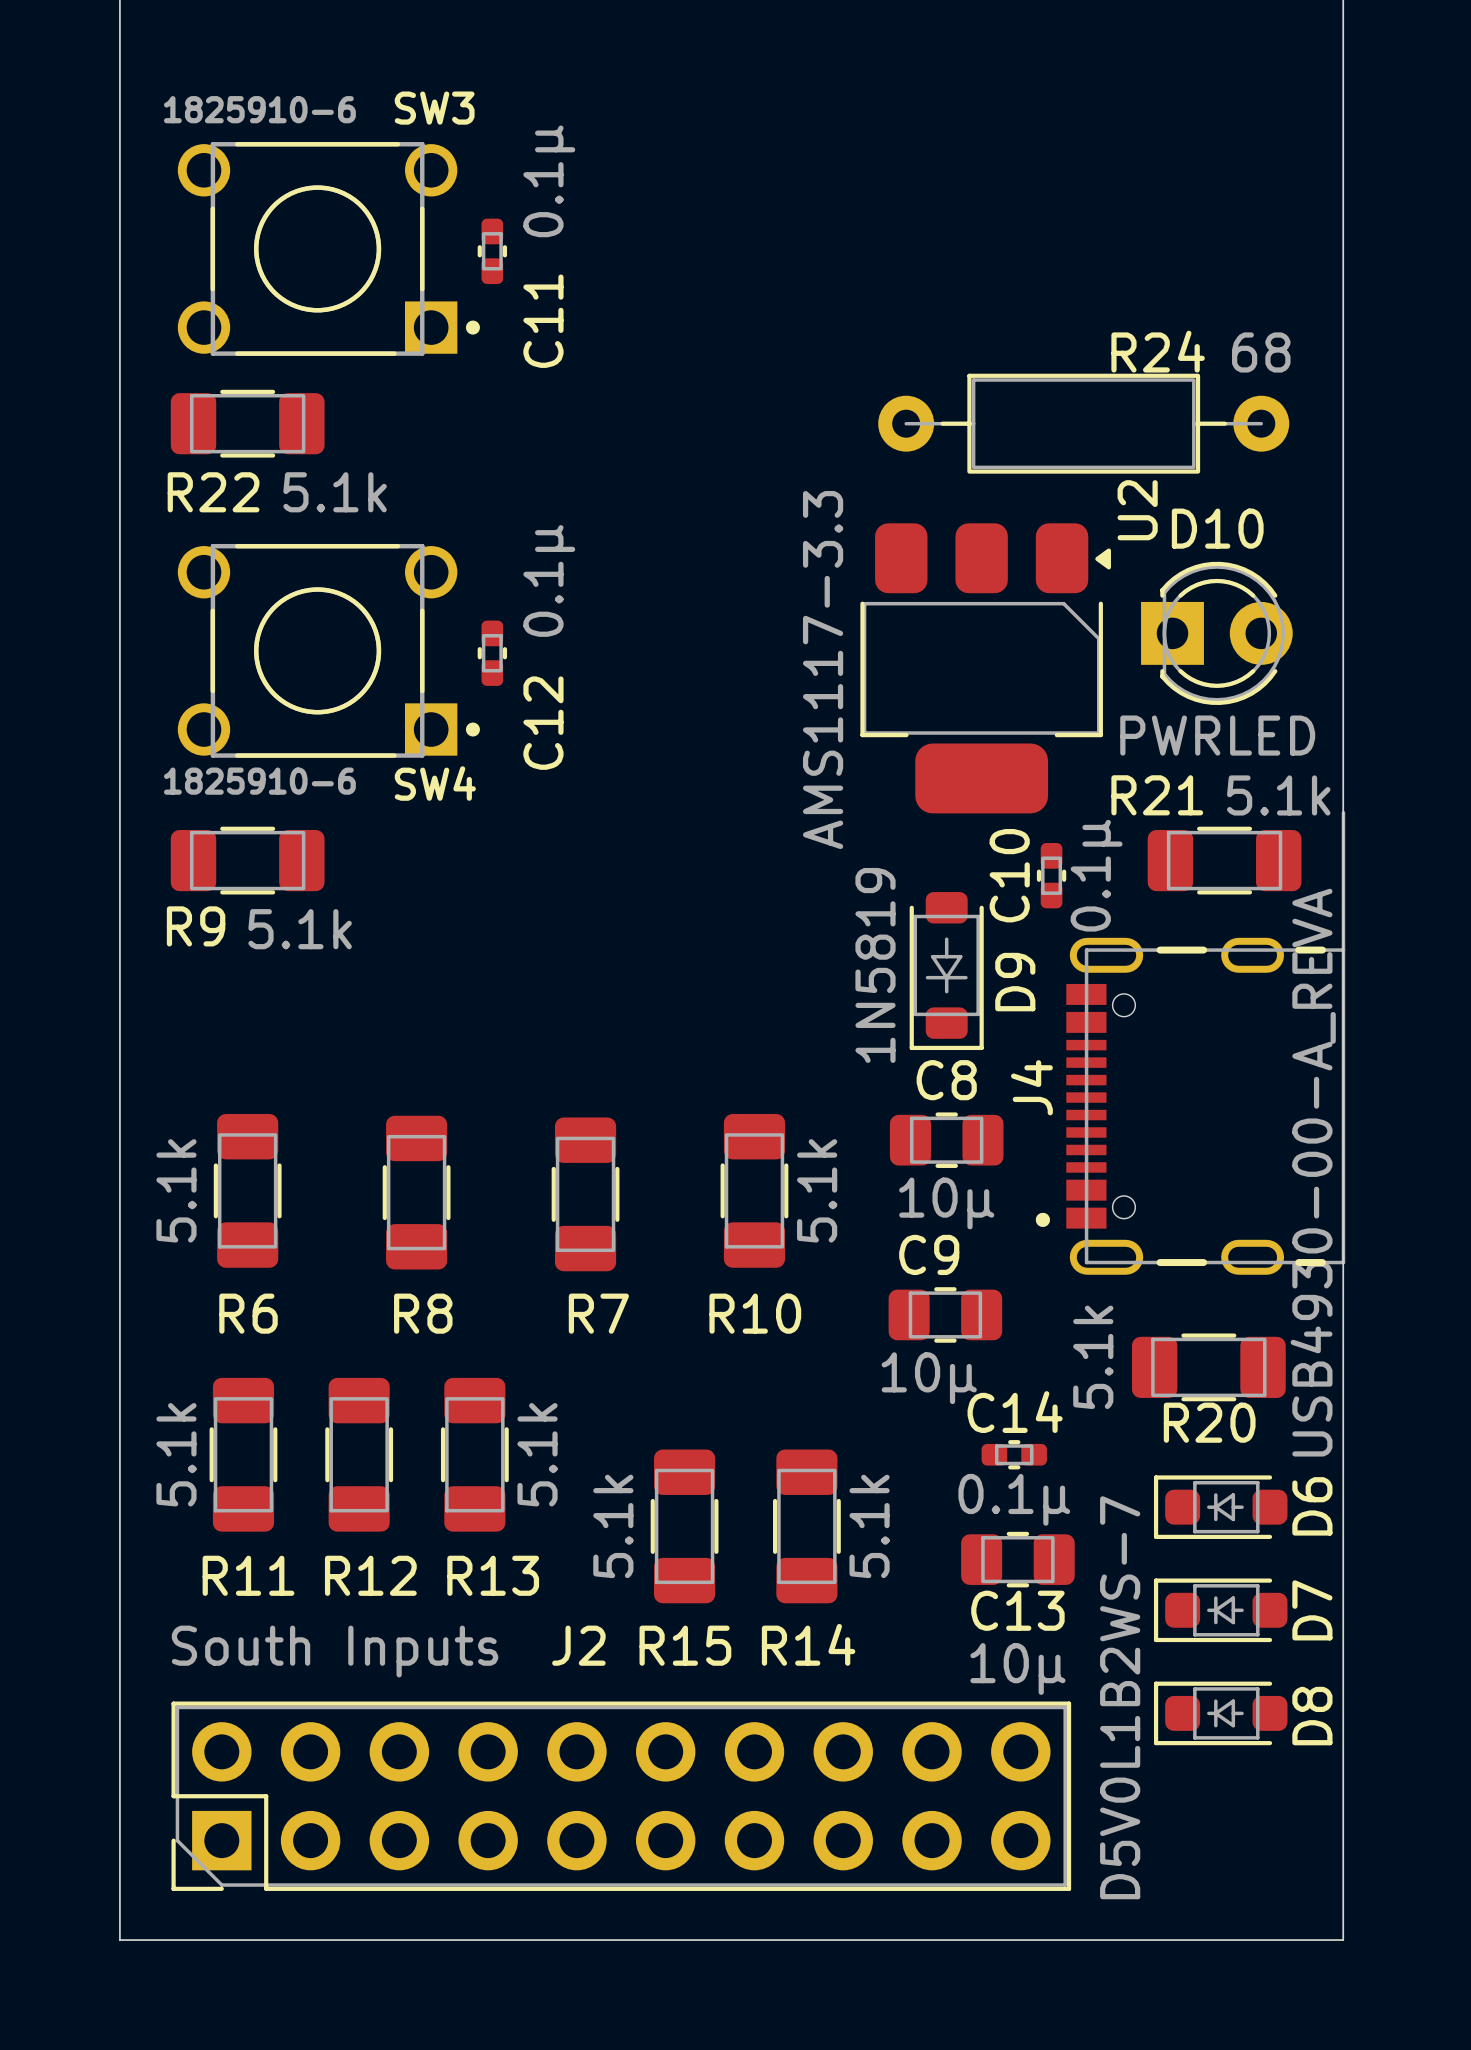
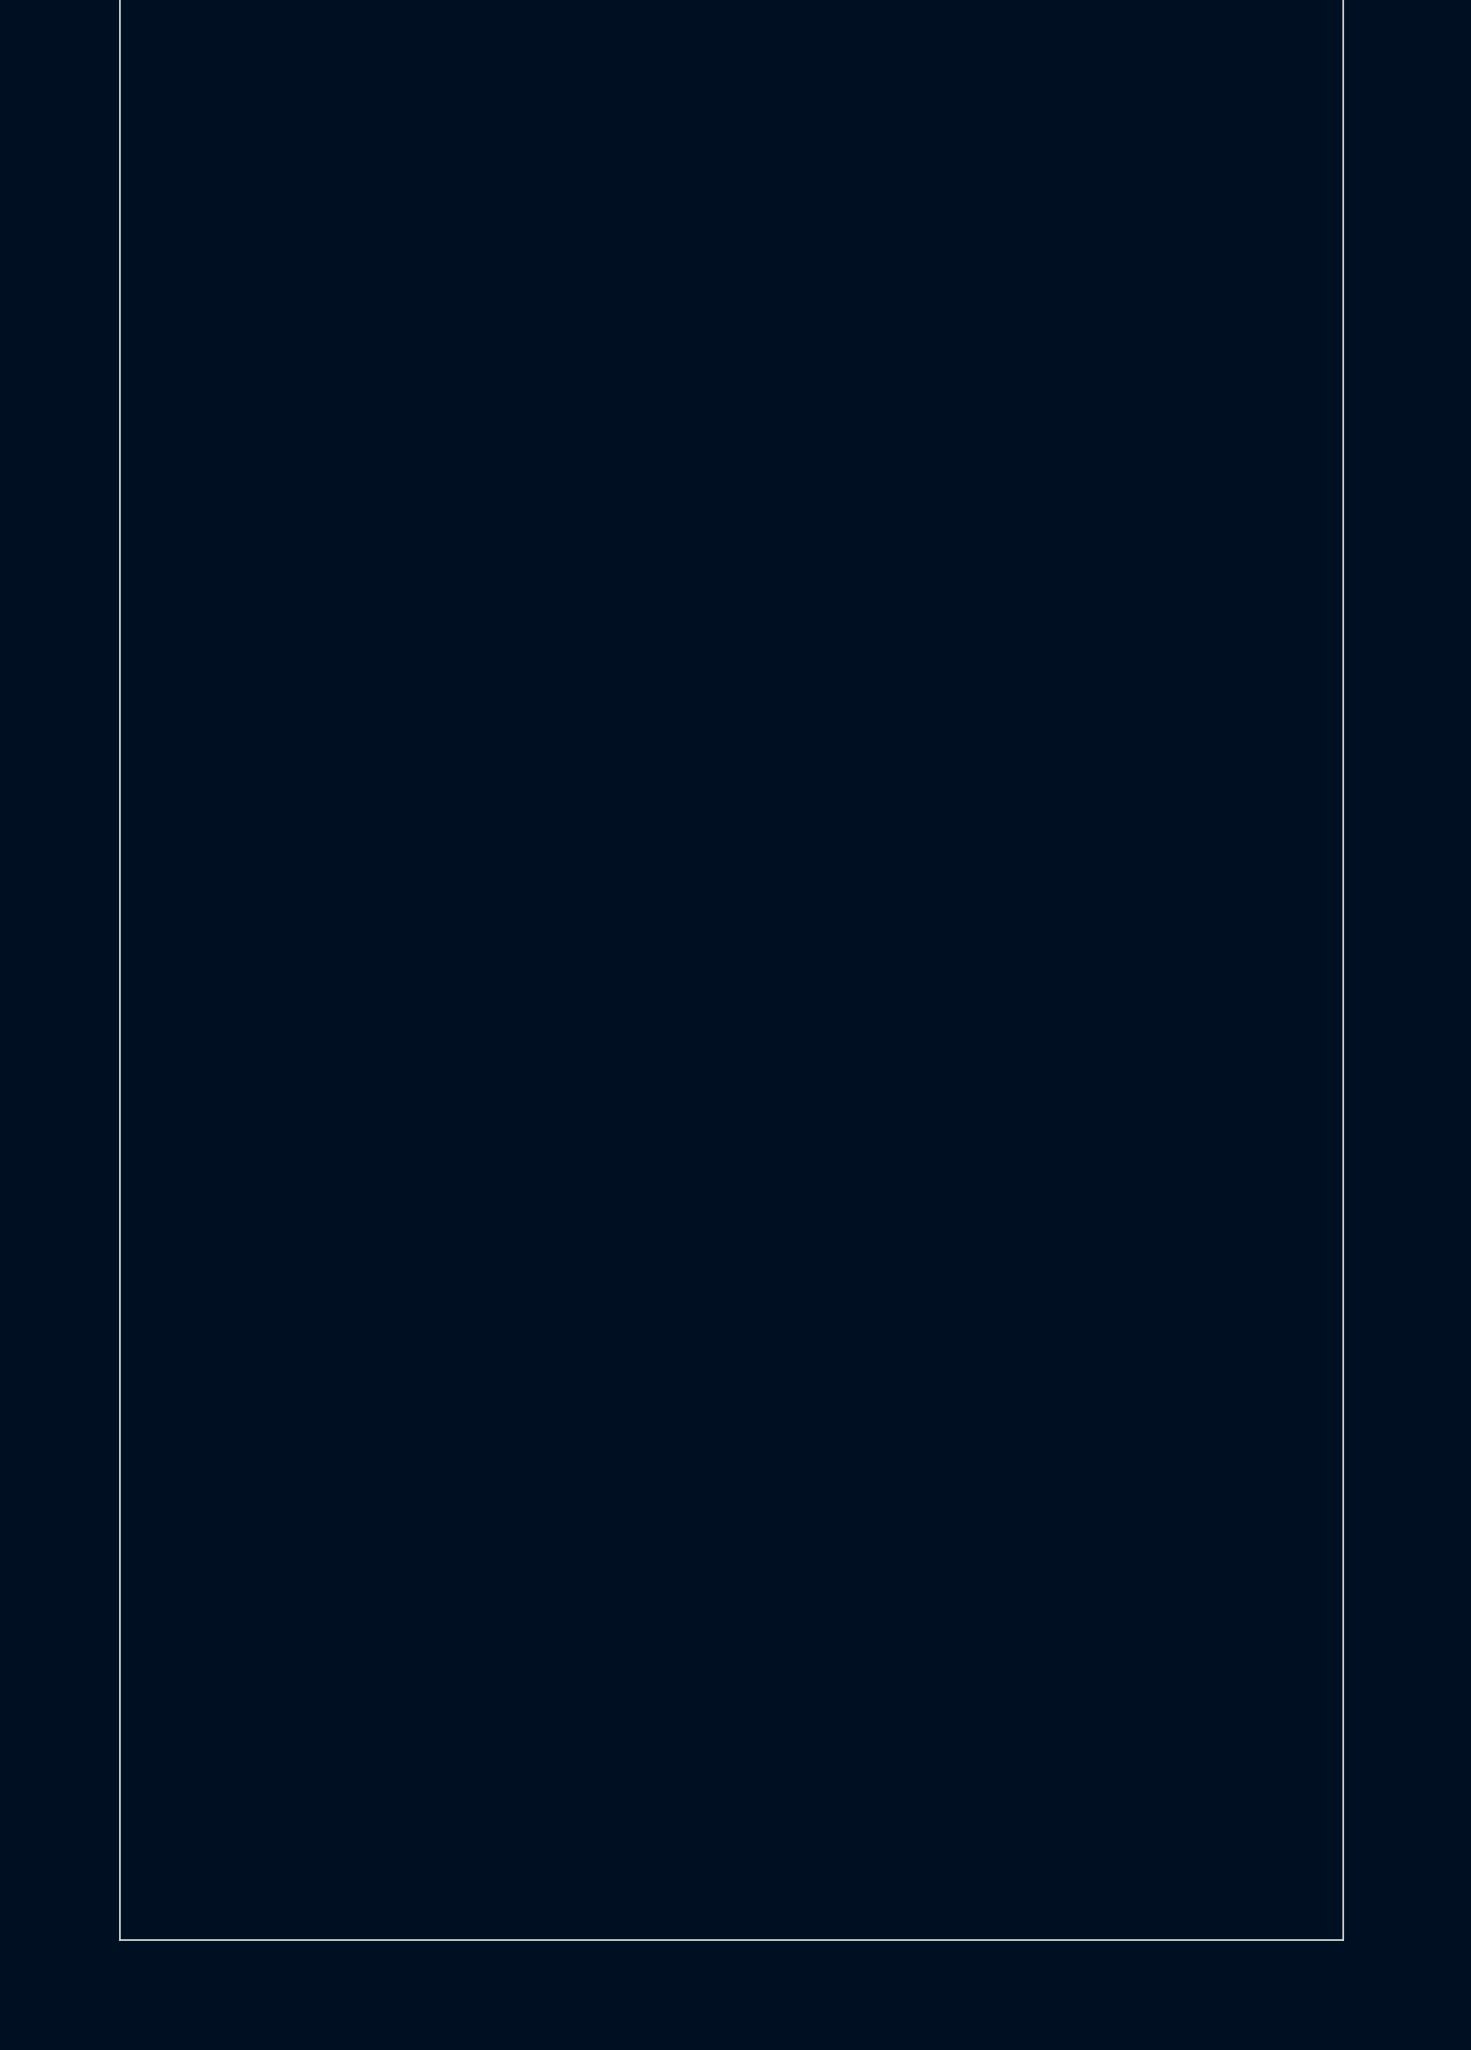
SW3: 1825910-6 (328, 248) -> none
C11: 0.1μ (492, 251) -> none
R22: 5.1k (247, 423) -> none
R24: 68 (1083, 423) -> none
D10: PWRLED (1216, 633) -> none
SW4: 1825910-6 (328, 650) -> none
C12: 0.1μ (492, 653) -> none
U2: AMS1117-3.3 (985, 668) -> none
R9: 5.1k (247, 860) -> none
R21: 5.1k (1224, 860) -> none
C10: 0.1μ (1051, 875) -> none
D9: 1N5819 (946, 971) -> none
J4: USB4930-00-A_REVA (1190, 1042) -> none
C8: 10μ (946, 1140) -> none
R6: 5.1k (247, 1190) -> none
R10: 5.1k (754, 1190) -> none
R8: (416, 1192) -> none
R7: (585, 1194) -> none
C9: 10μ (945, 1314) -> none
R20: 5.1k (1208, 1367) -> none
R11: 5.1k (243, 1454) -> none
R12: (359, 1454) -> none
R13: 5.1k (474, 1454) -> none
C14: 0.1μ (1014, 1454) -> none
D6: (1220, 1507) -> none
R15: 5.1k (684, 1526) -> none
R14: 5.1k (806, 1526) -> none
C13: 10μ (1017, 1559) -> none
D7: (1220, 1610) -> none
D8: D5V0L1B2WS-7 (1220, 1713) -> none
J2: South Inputs (621, 1796) -> none

